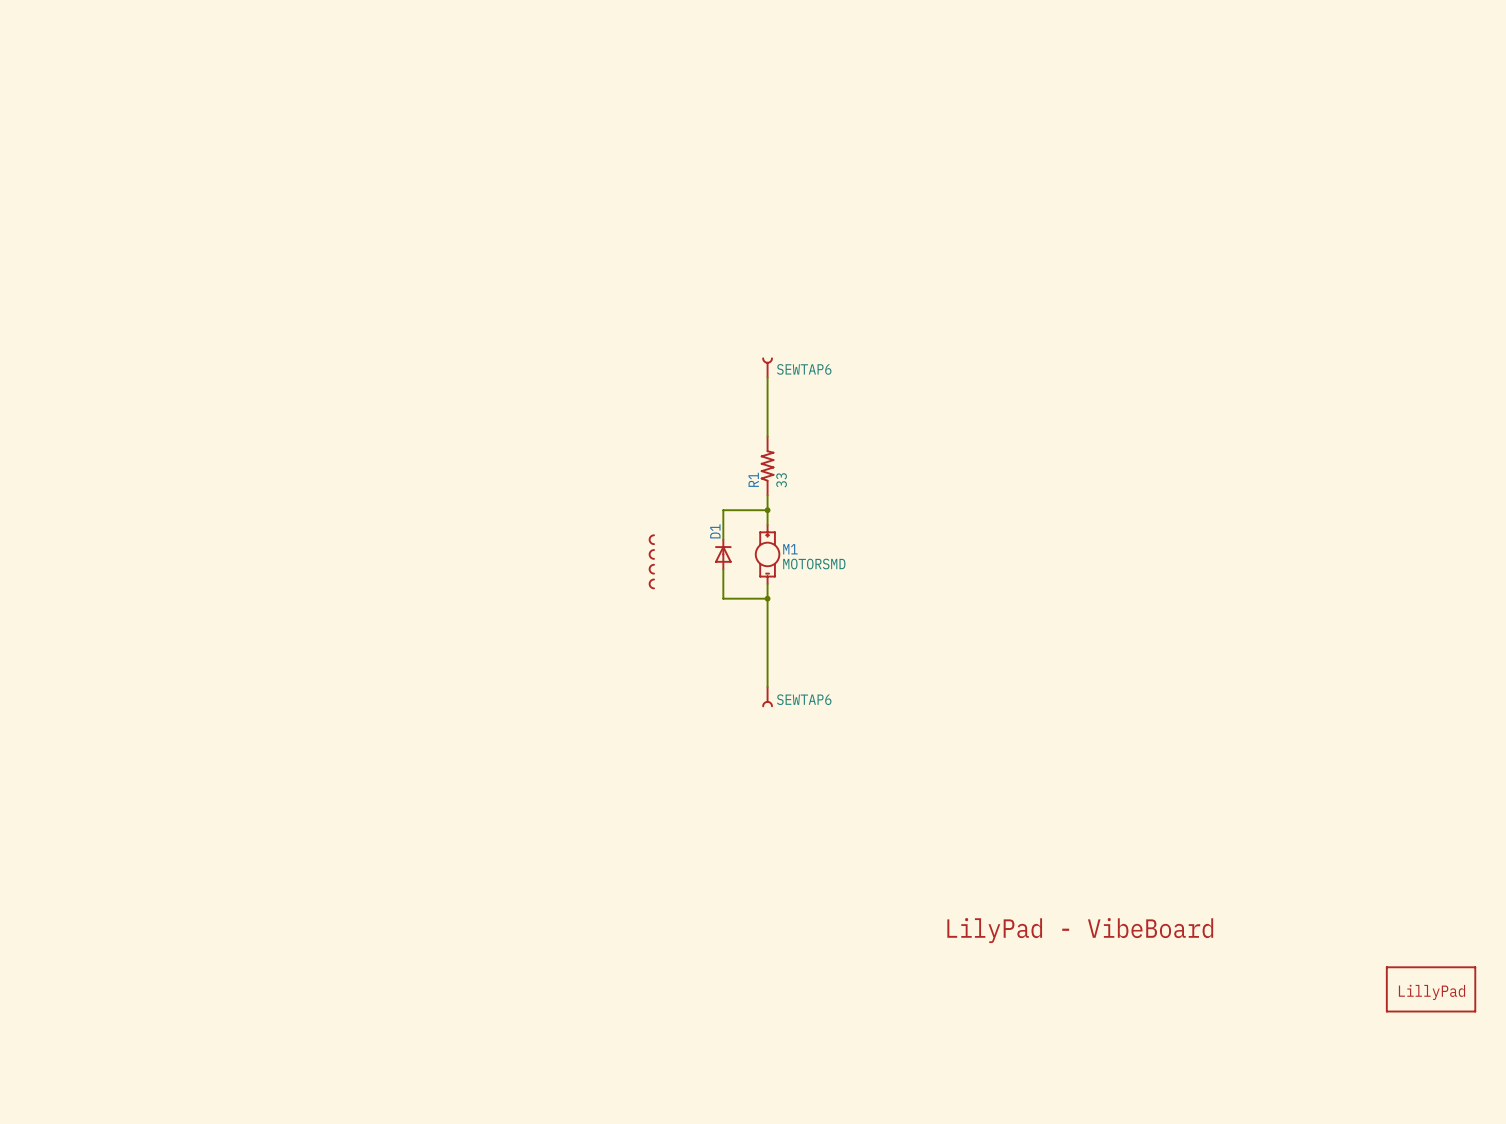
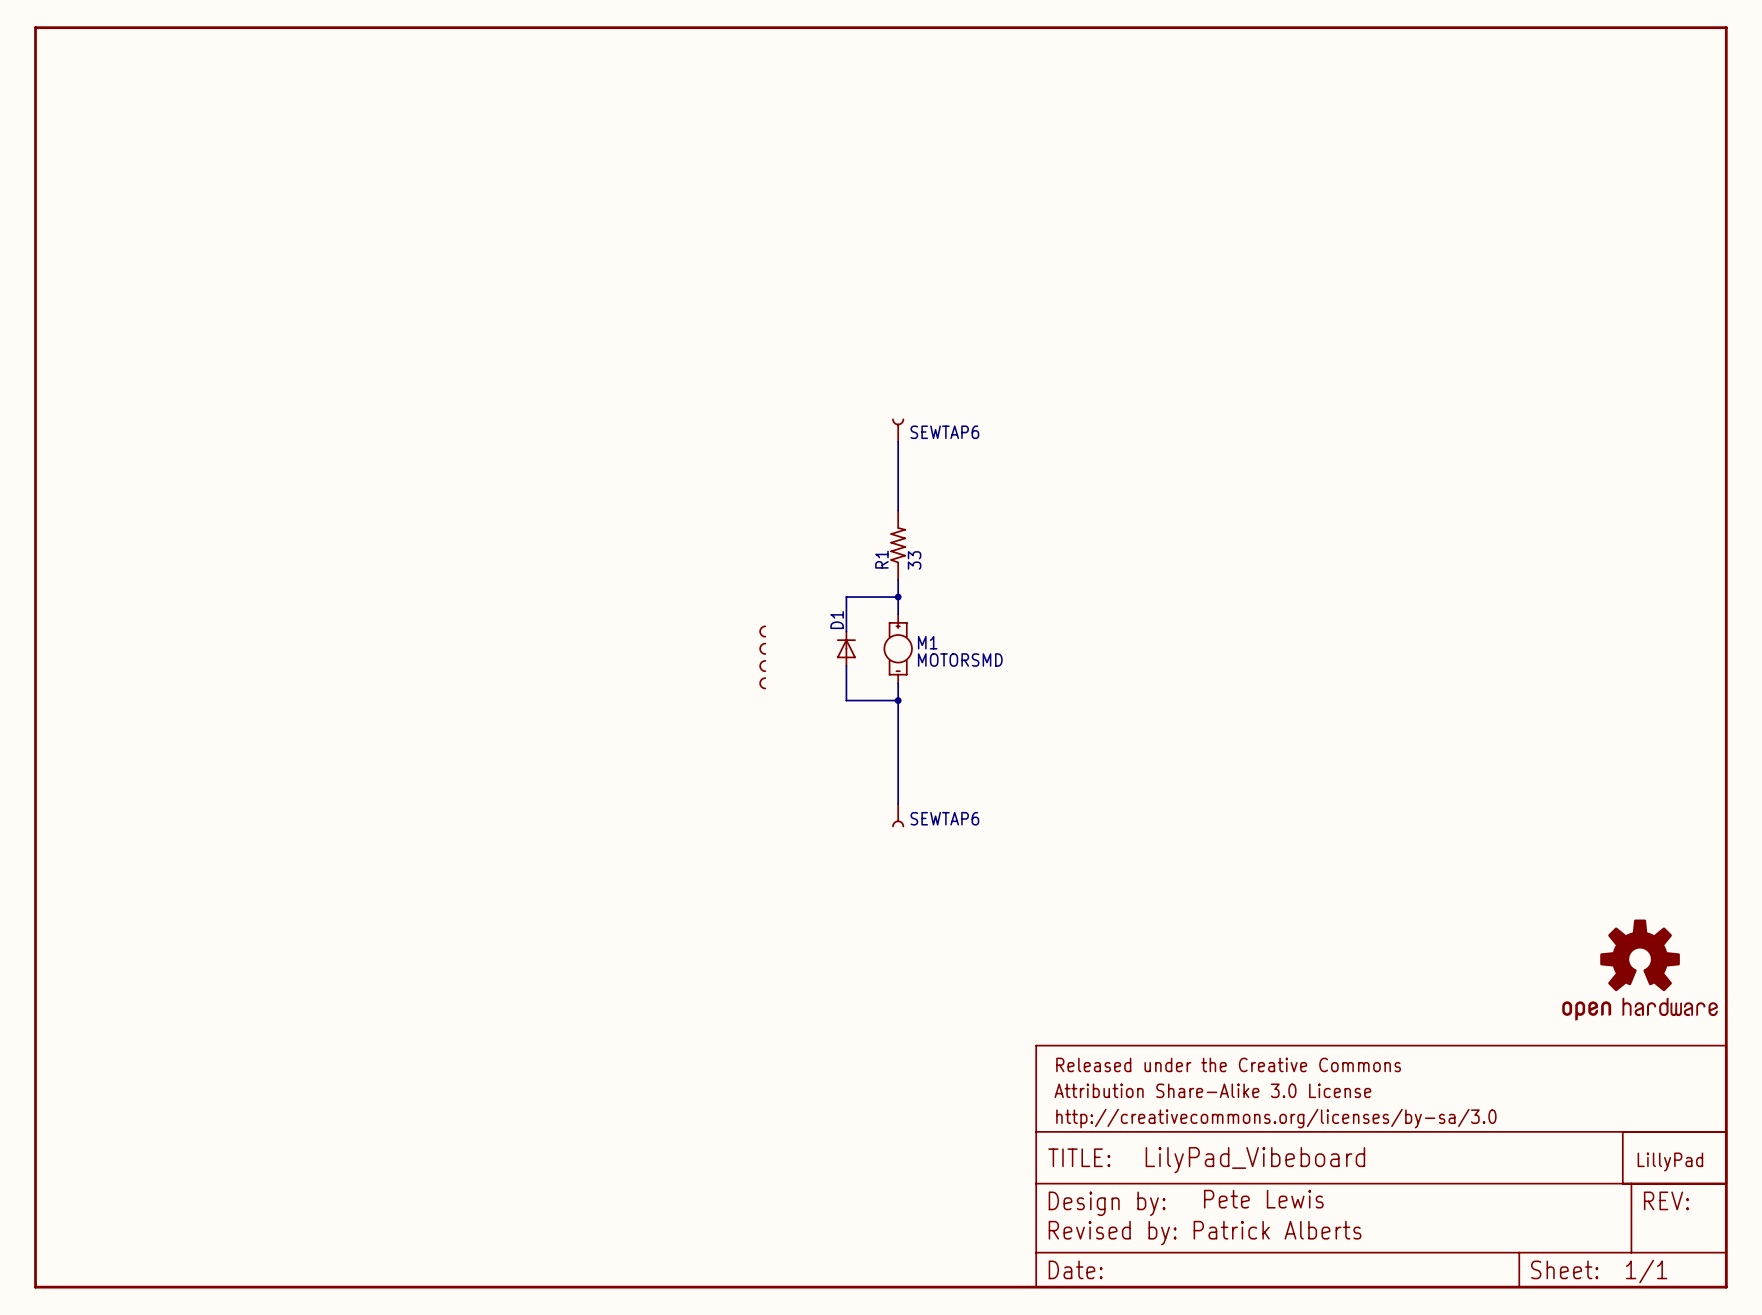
part: none -> (880, 657)
part: none -> (1640, 970)
text: LilyPad - VibeBoard (1080, 930) -> none
part: none -> (1381, 1166)
text: none -> Pete Lewis (1263, 1199)
text: none -> Revised by: Patrick Alberts (1205, 1233)

